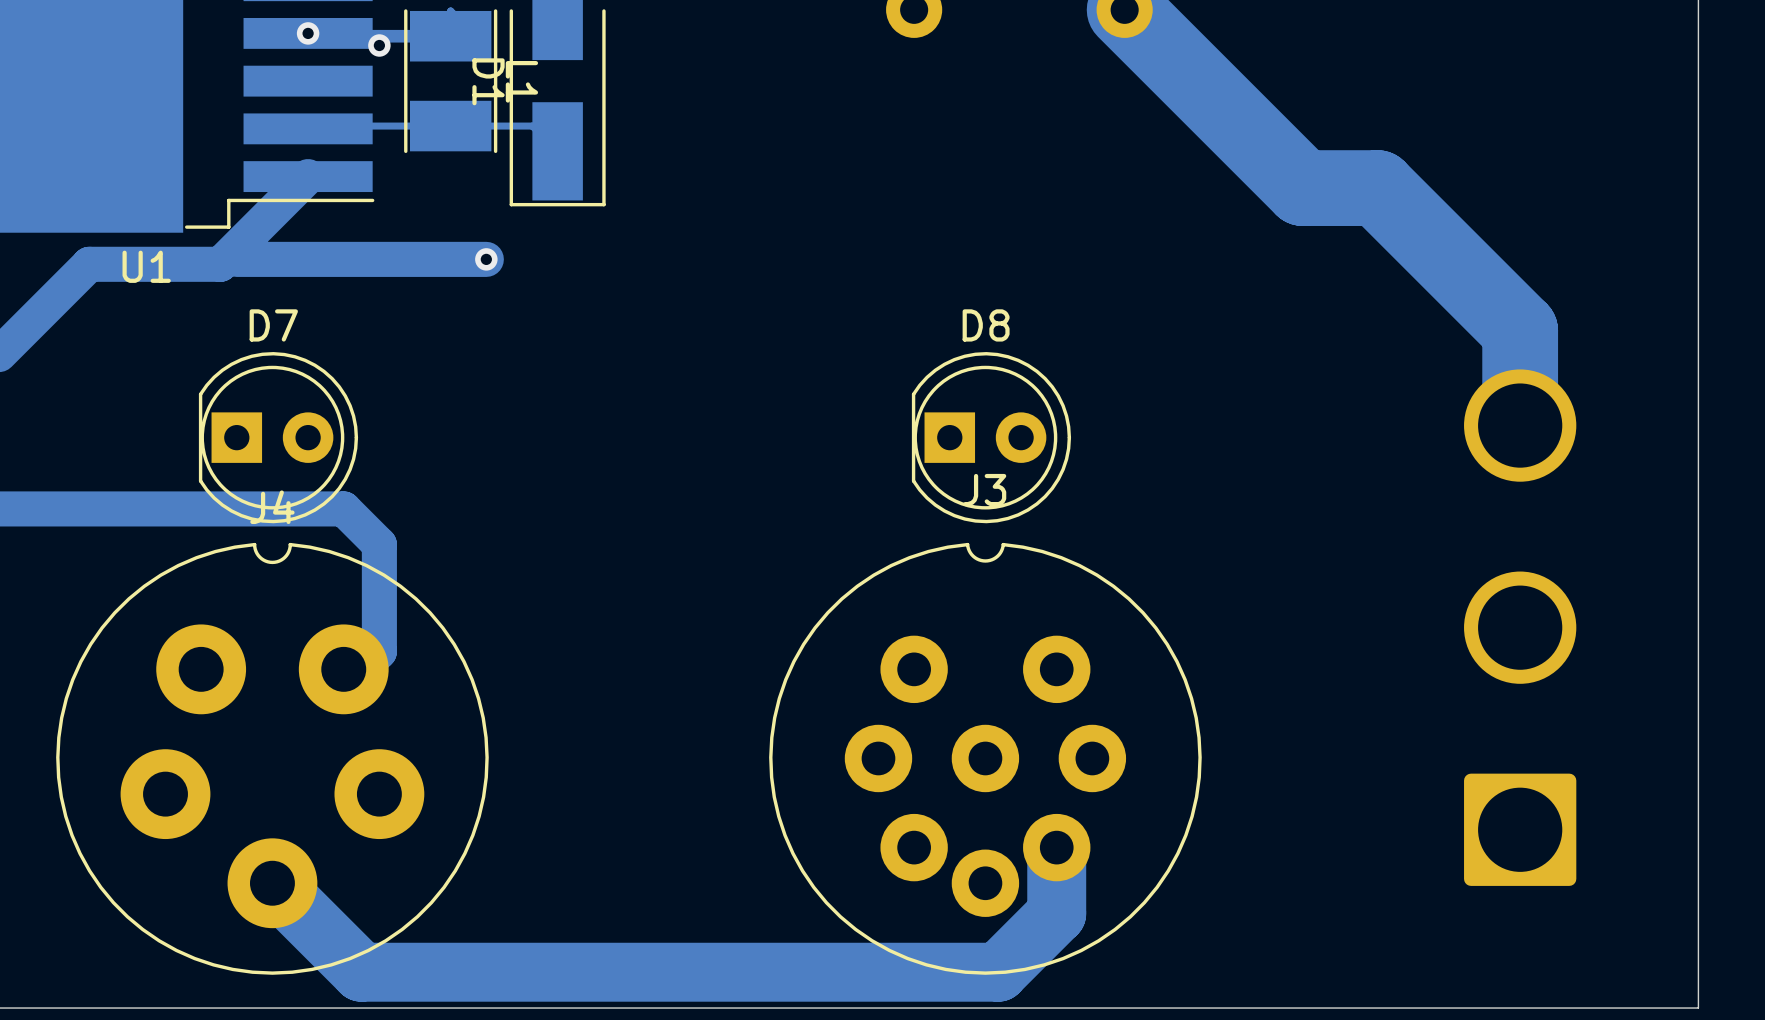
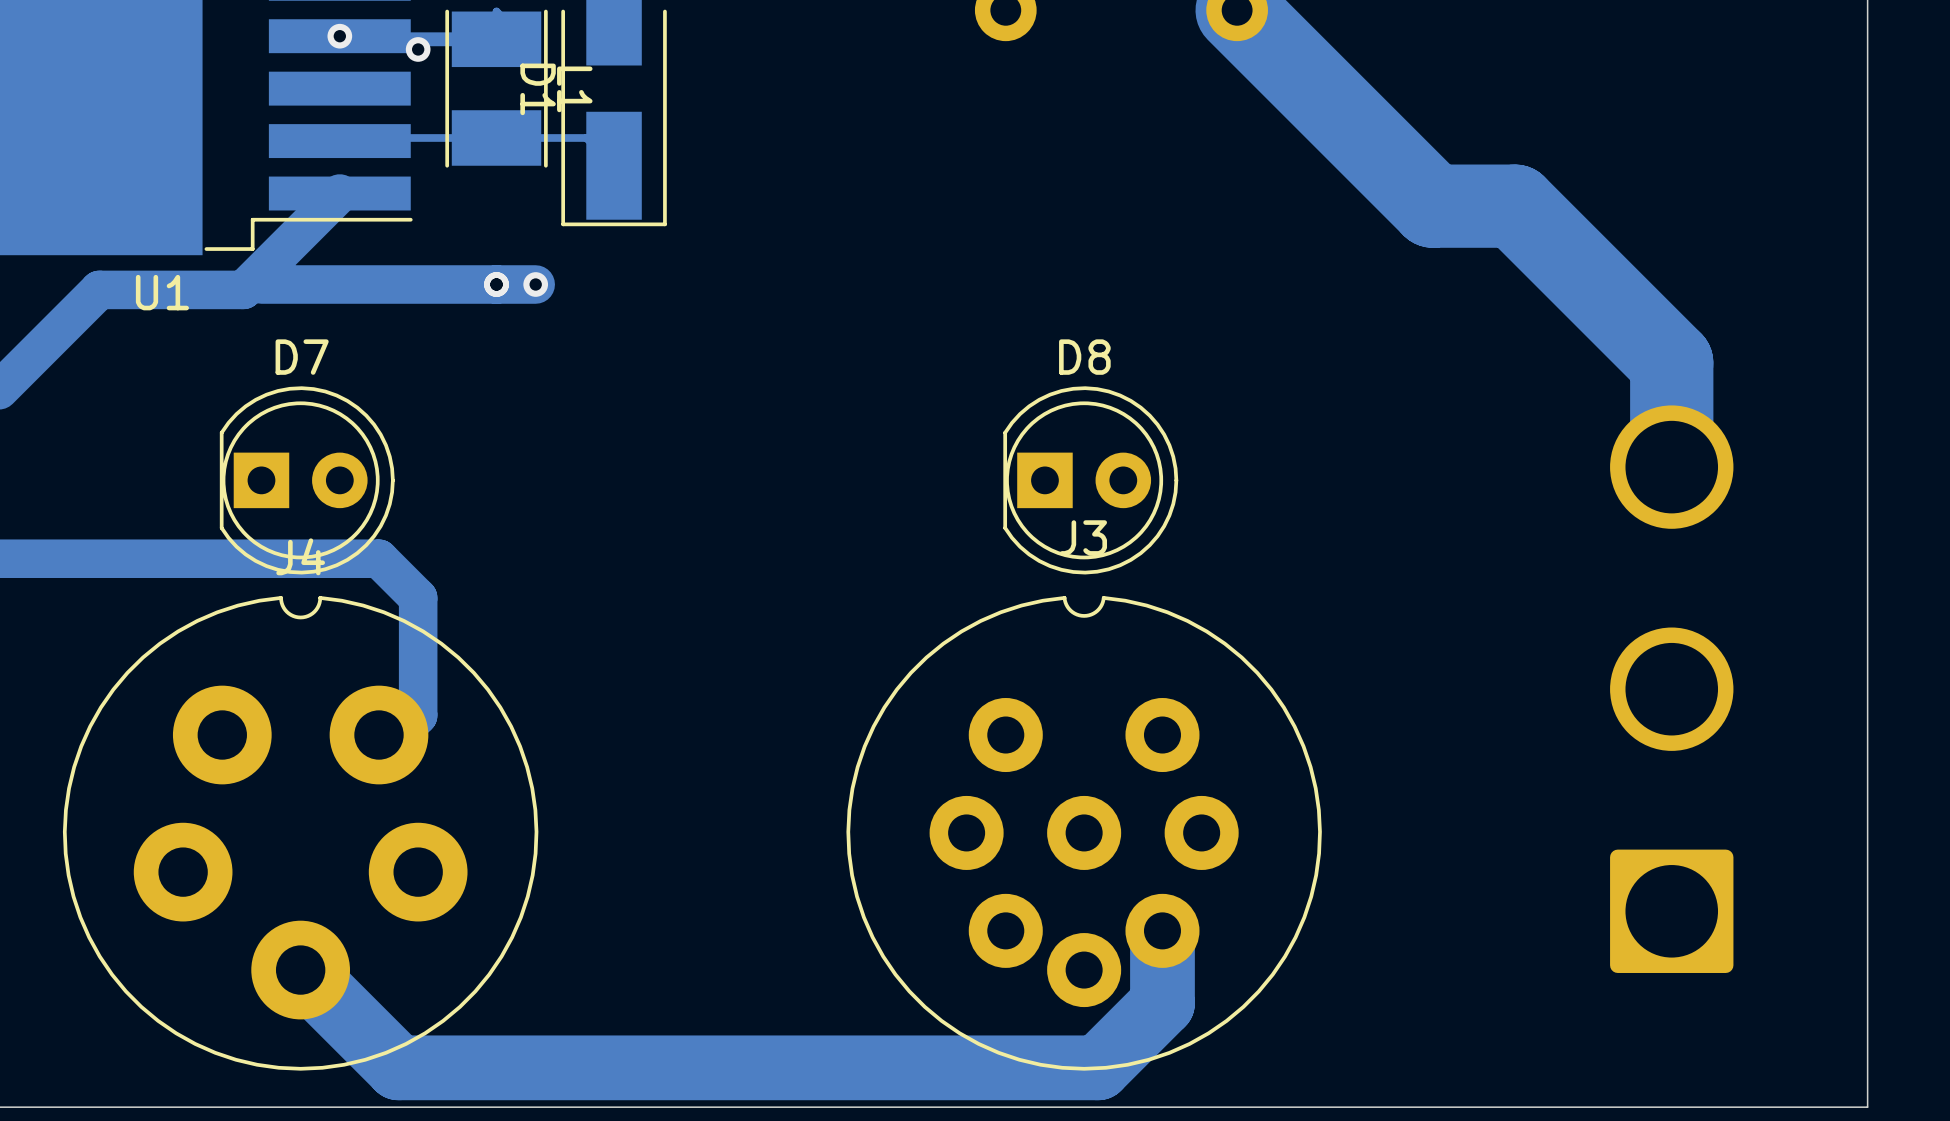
via: none -> (496, 284)

